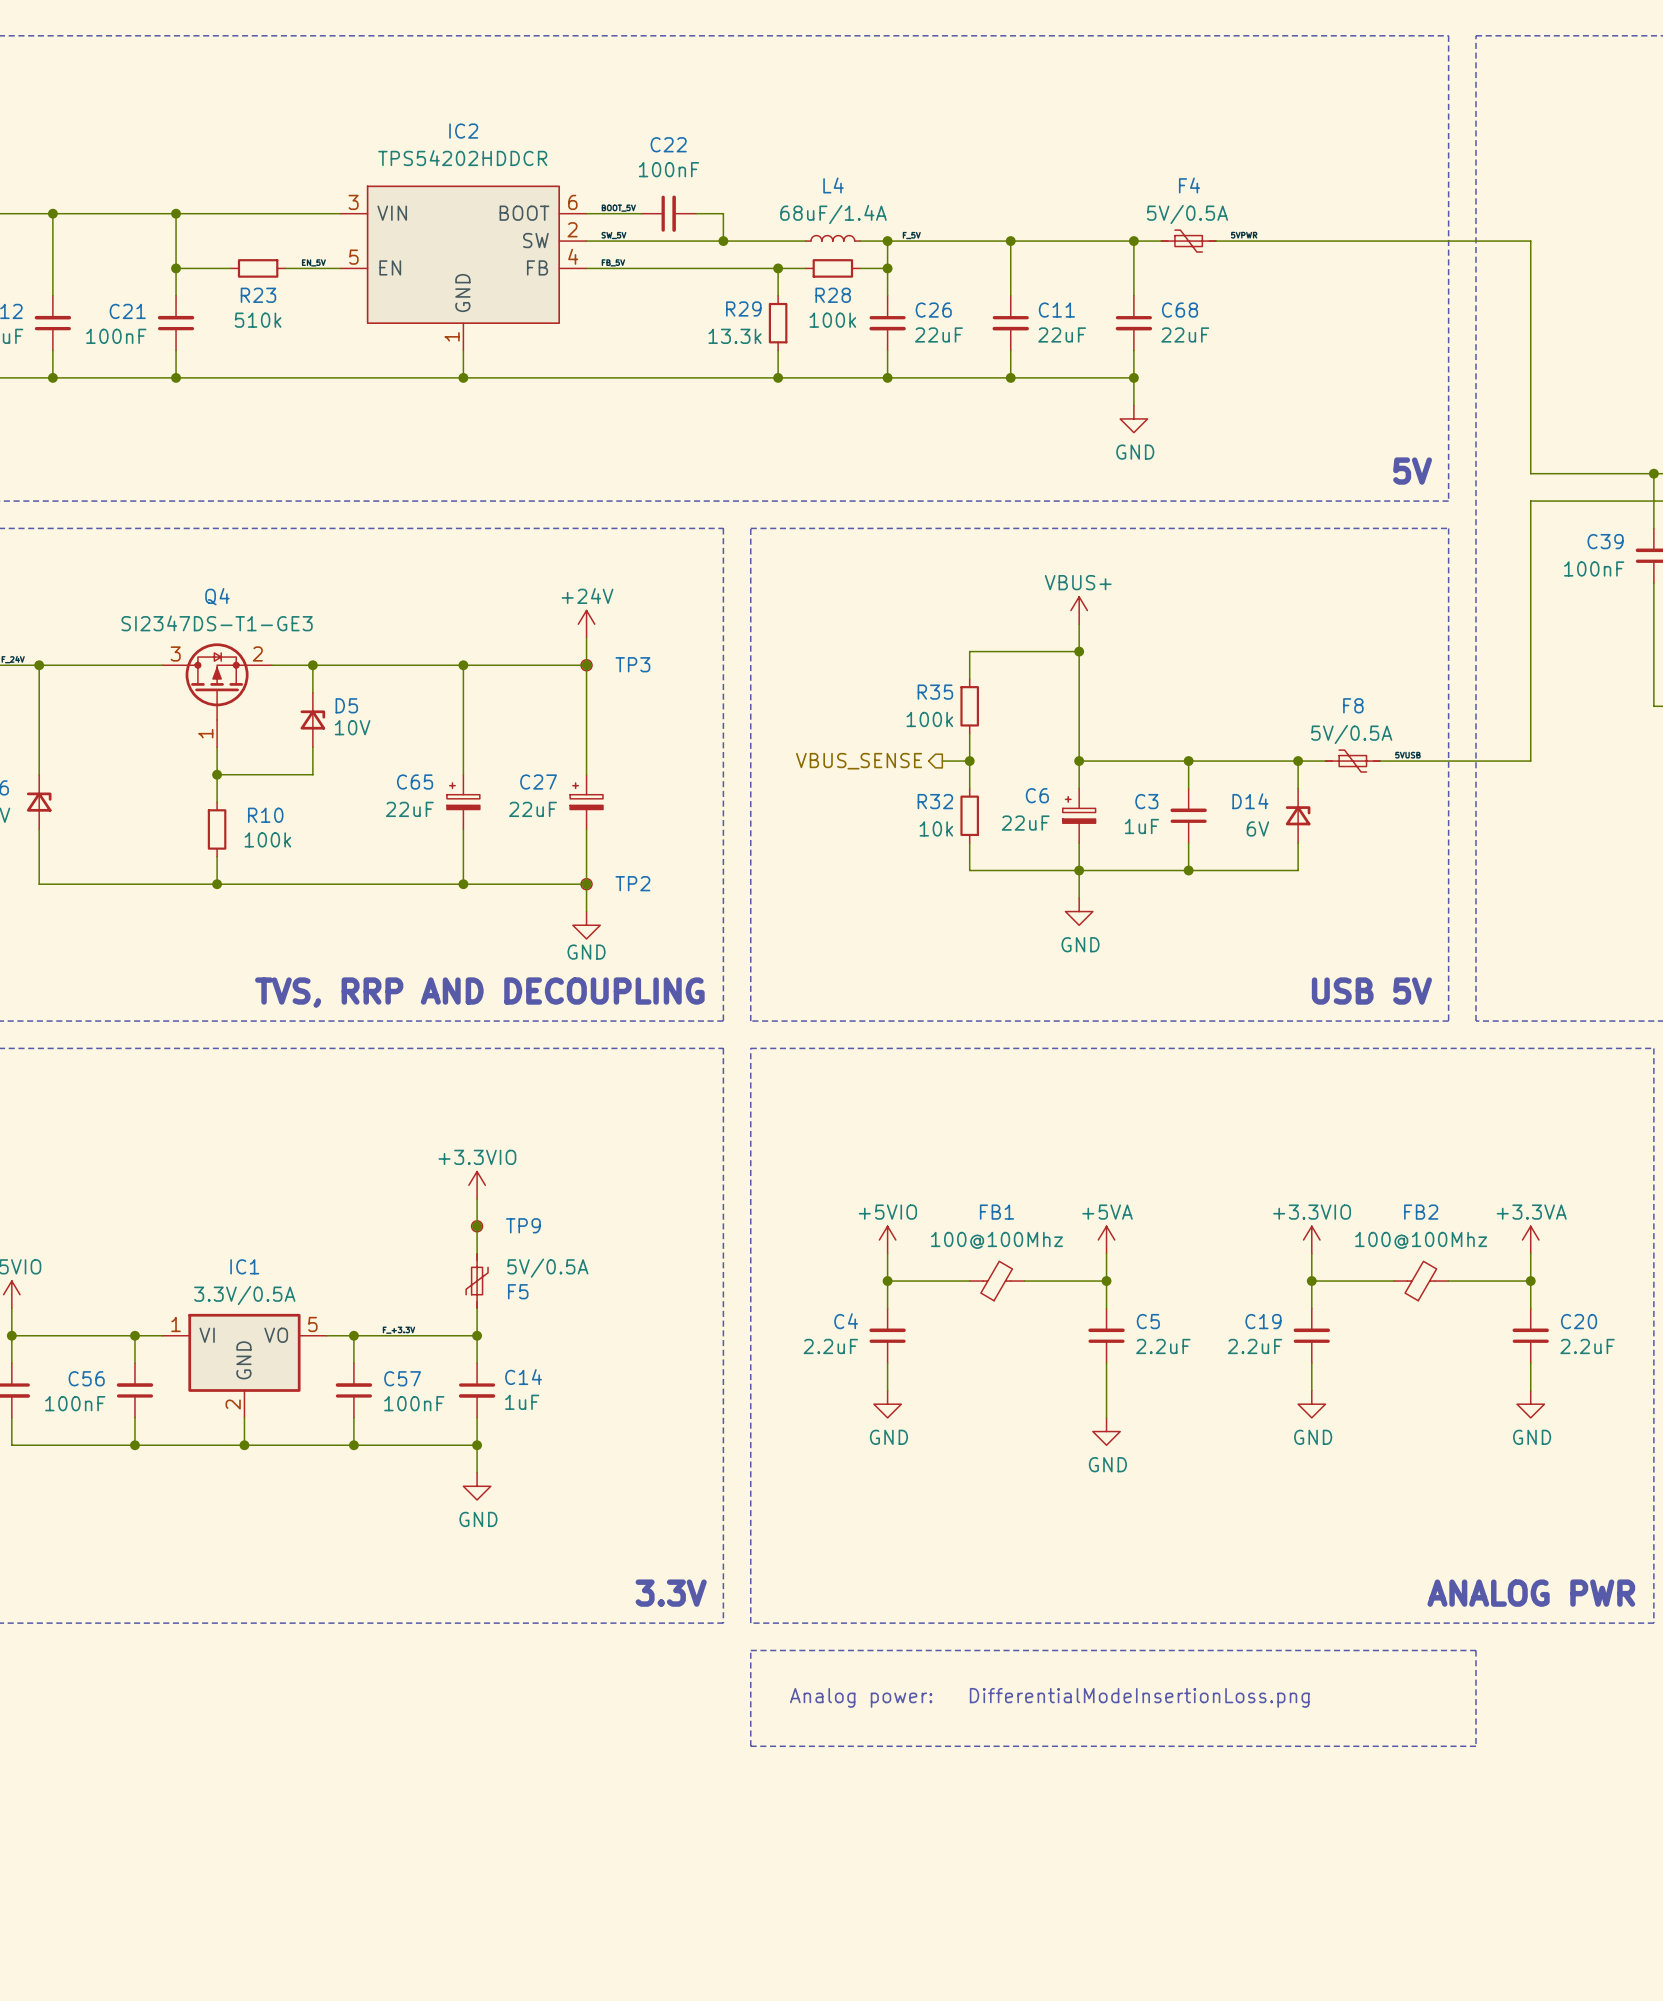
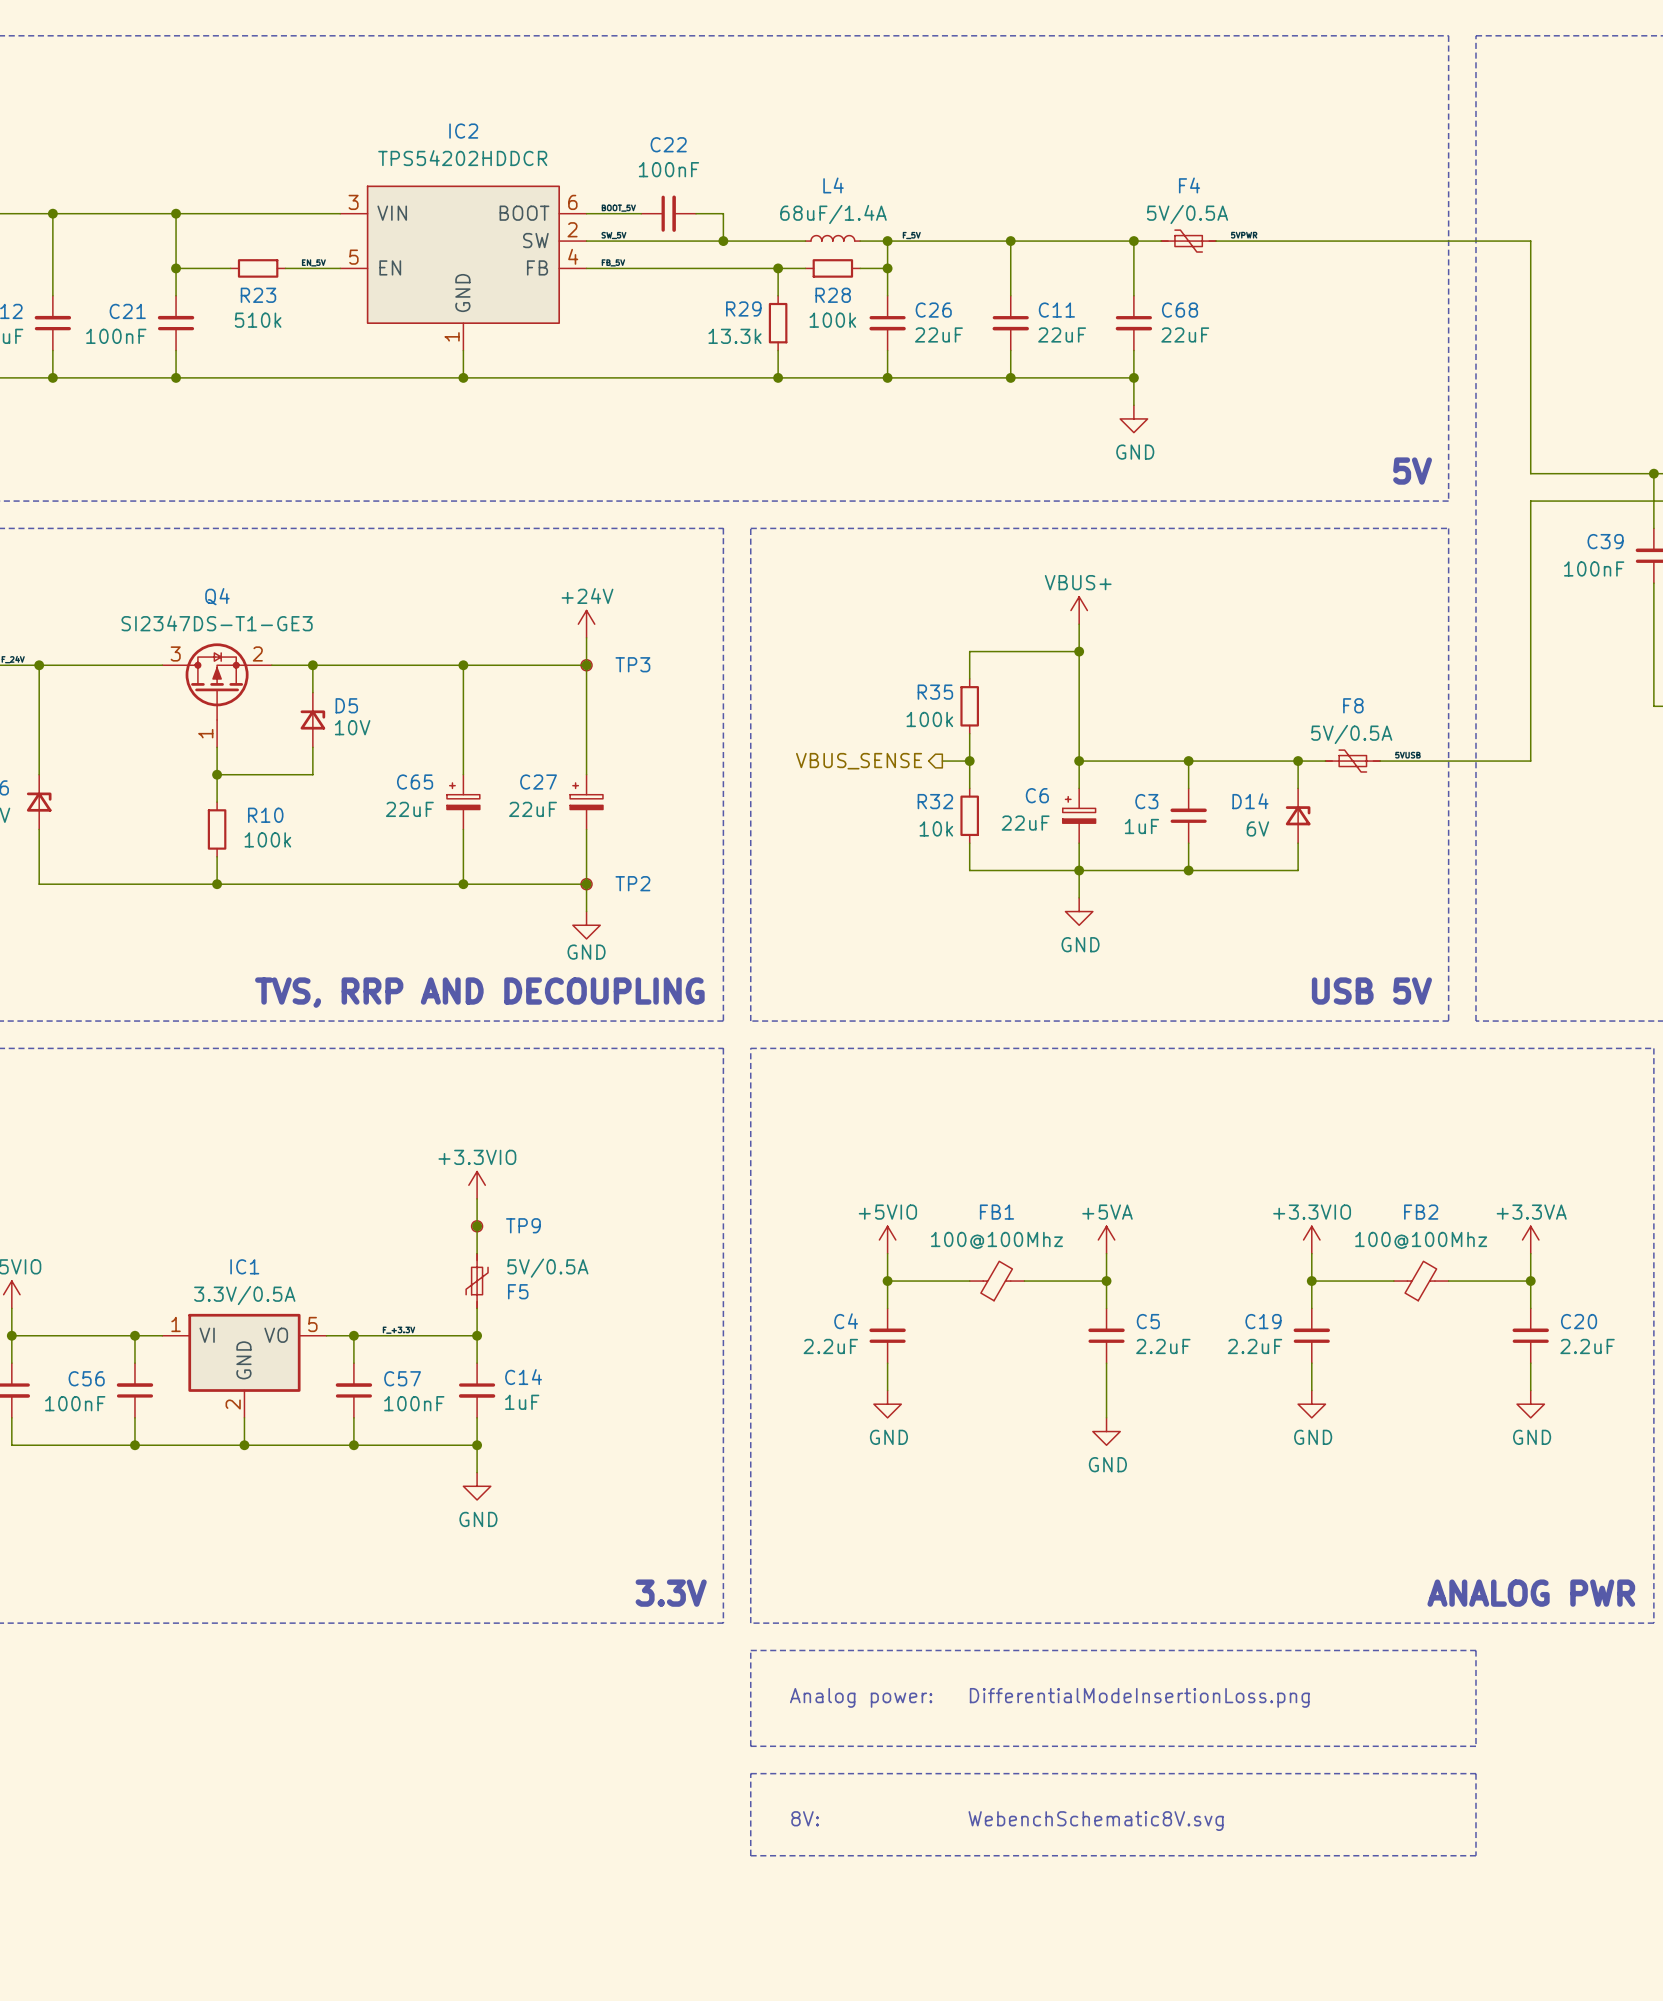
line: none -> (750, 1773) (1475, 1773) (1475, 1855) (750, 1855) (750, 1773)
text: none -> 8V: (805, 1818)
text: none -> WebenchSchematic8V.svg (1096, 1821)

